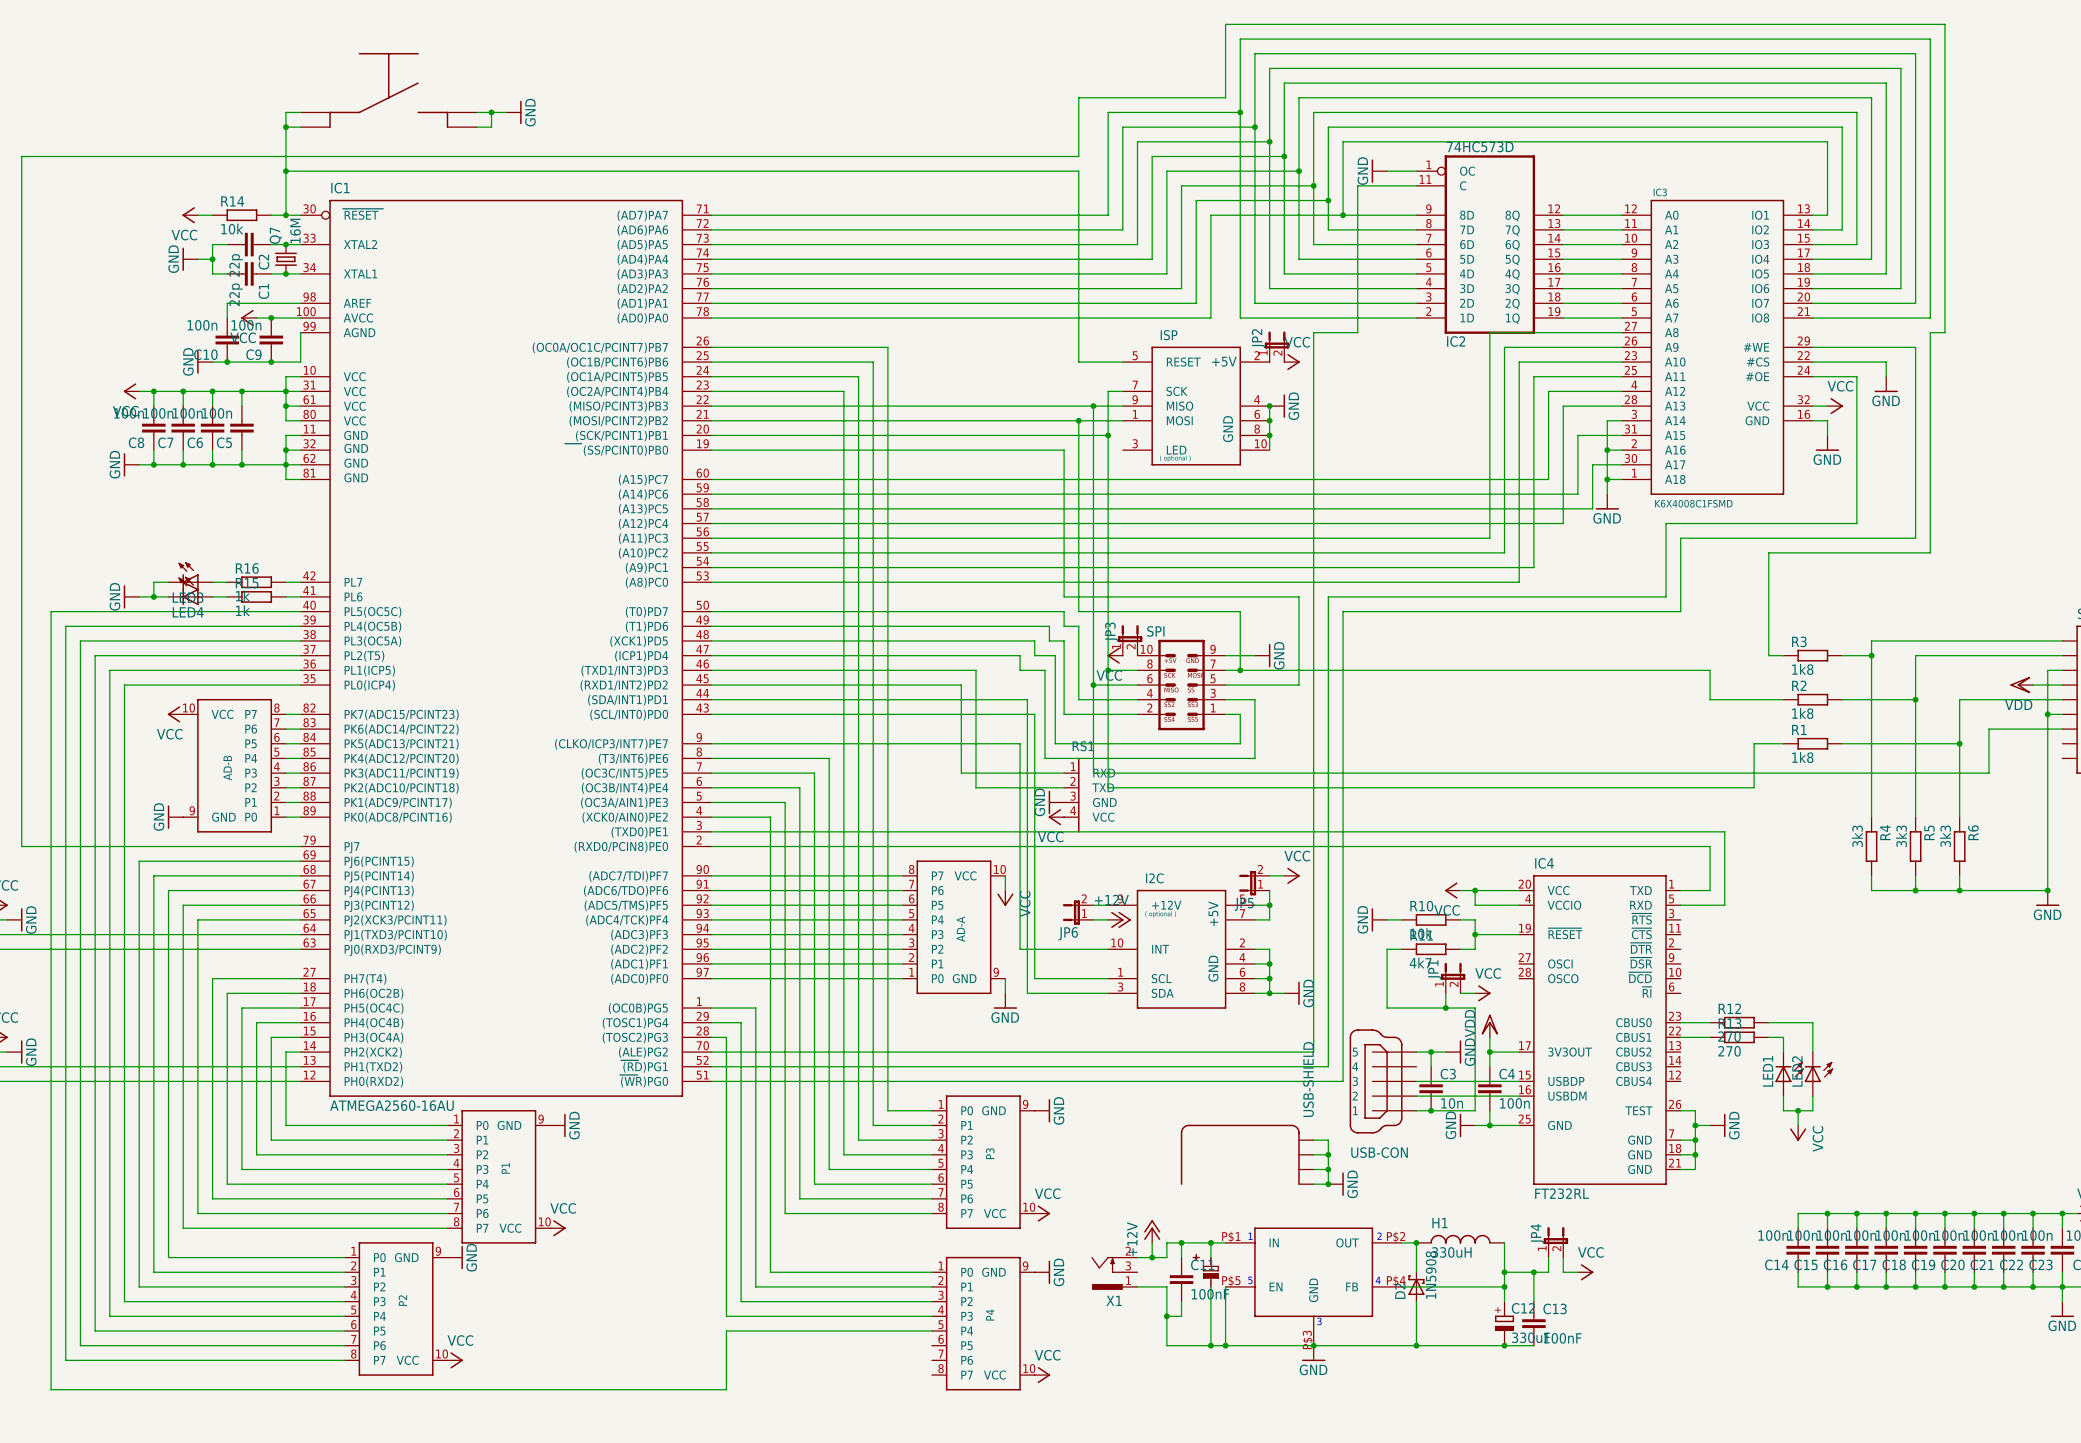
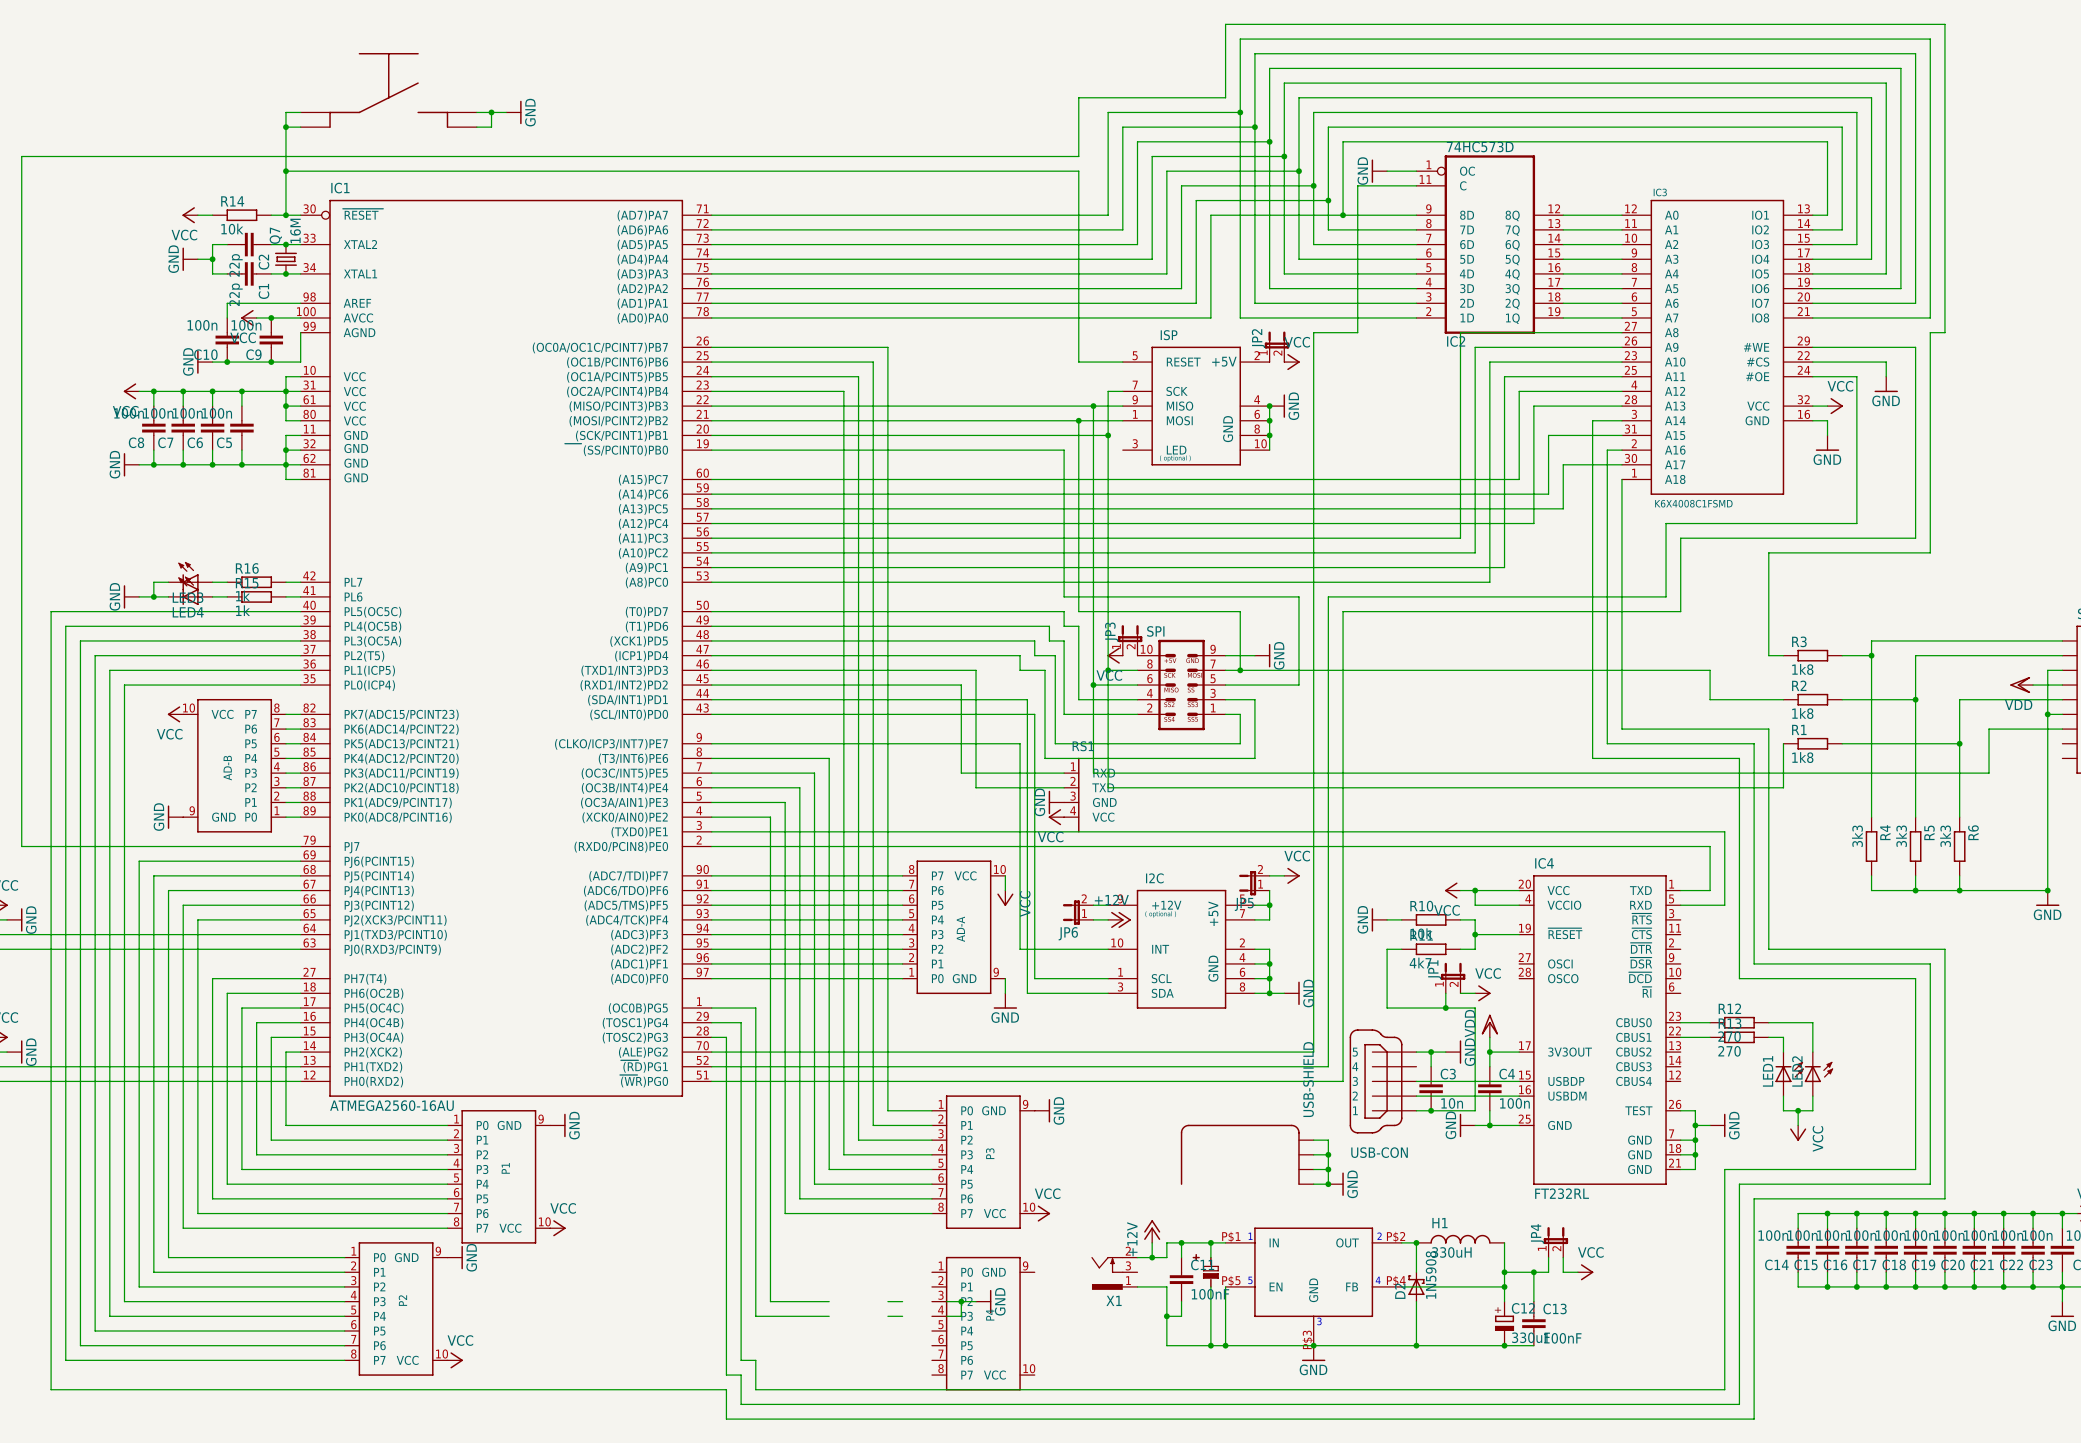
wire: (1489, 332) (1489, 362) -> (1519, 362) (1489, 362)
wire: none -> (1489, 332) (1460, 332) (1460, 538)
wire: (1504, 347) (1504, 376) -> (1533, 376) (1504, 376)
wire: none -> (1504, 347) (1475, 347) (1475, 552)
wire: (1519, 362) (1519, 391) -> (1548, 391) (1519, 391)
wire: (1533, 376) (1533, 406) -> (1563, 406) (1533, 406)
wire: (1548, 391) (1548, 435) -> (1577, 435) (1548, 435)
wire: (1563, 406) (1563, 464) -> (1607, 420) (1592, 420) (1592, 464) (1563, 464)
wire: (1607, 420) (1607, 450) -> none
wire: (1577, 435) (1577, 494) (1548, 494) -> (1548, 479) (1548, 494)
junction: (1607, 450) -> none
wire: (1548, 479) (1519, 479) (1519, 582) (1489, 582) -> none
wire: (1607, 479) (1621, 479) -> (726, 1389) (726, 1419) (1754, 1419) (1754, 1198) (1944, 1198) (1944, 949) (1768, 949) (1768, 729) (1621, 729) (1621, 479)
junction: (1607, 479) -> none
power symbol: GND (1607, 501) -> none
wire: (1592, 508) (1563, 508) (1563, 523) (1533, 523) (1533, 567) (1504, 567) -> (1592, 508) (1592, 758) (1739, 758) (1739, 978) (1915, 978) (1915, 1169) (1724, 1169) (1724, 1389) (755, 1389) (755, 1360) (741, 1360) (741, 1301)
wire: (1460, 538) (1489, 538) -> (1489, 582) (1489, 538)
wire: (1475, 552) (1504, 552) -> (1504, 567) (1504, 552)
wire: (1754, 743) (1783, 743) -> (1754, 743) (1607, 743) (1607, 494)
wire: (770, 1272) (931, 1272) -> none
power symbol position: GND (1042, 1272) -> GND (983, 1301)
wire: (755, 1286) (931, 1286) -> (755, 1286) (755, 1316)
wire: (741, 1301) (770, 1301) -> (770, 1272) (770, 1301)
wire: (829, 1301) (887, 1301) -> none
wire: (902, 1301) (931, 1301) -> (946, 1301) (976, 1301)
wire: none -> (961, 1301) (961, 1316) (946, 1316)
junction: none -> (961, 1301)
wire: (726, 1316) (755, 1316) -> (726, 1316) (726, 1331)
wire: (829, 1316) (887, 1316) -> none
wire: (902, 1316) (931, 1316) -> none
wire: (726, 1331) (931, 1331) -> none
wire: (726, 1375) (726, 1389) -> (726, 1375) (741, 1375) (741, 1404) (1739, 1404) (1739, 1184) (1930, 1184) (1930, 963) (1754, 963) (1754, 787) (1783, 787) (1783, 743)
power symbol: VCC (1042, 1375) -> none

